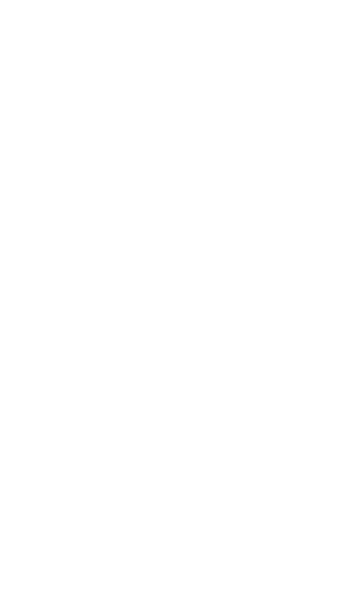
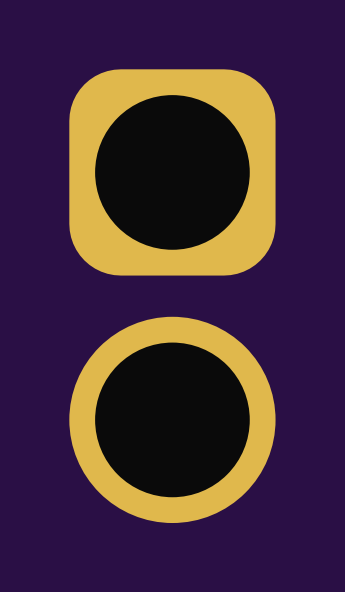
part: none -> (172, 296)

